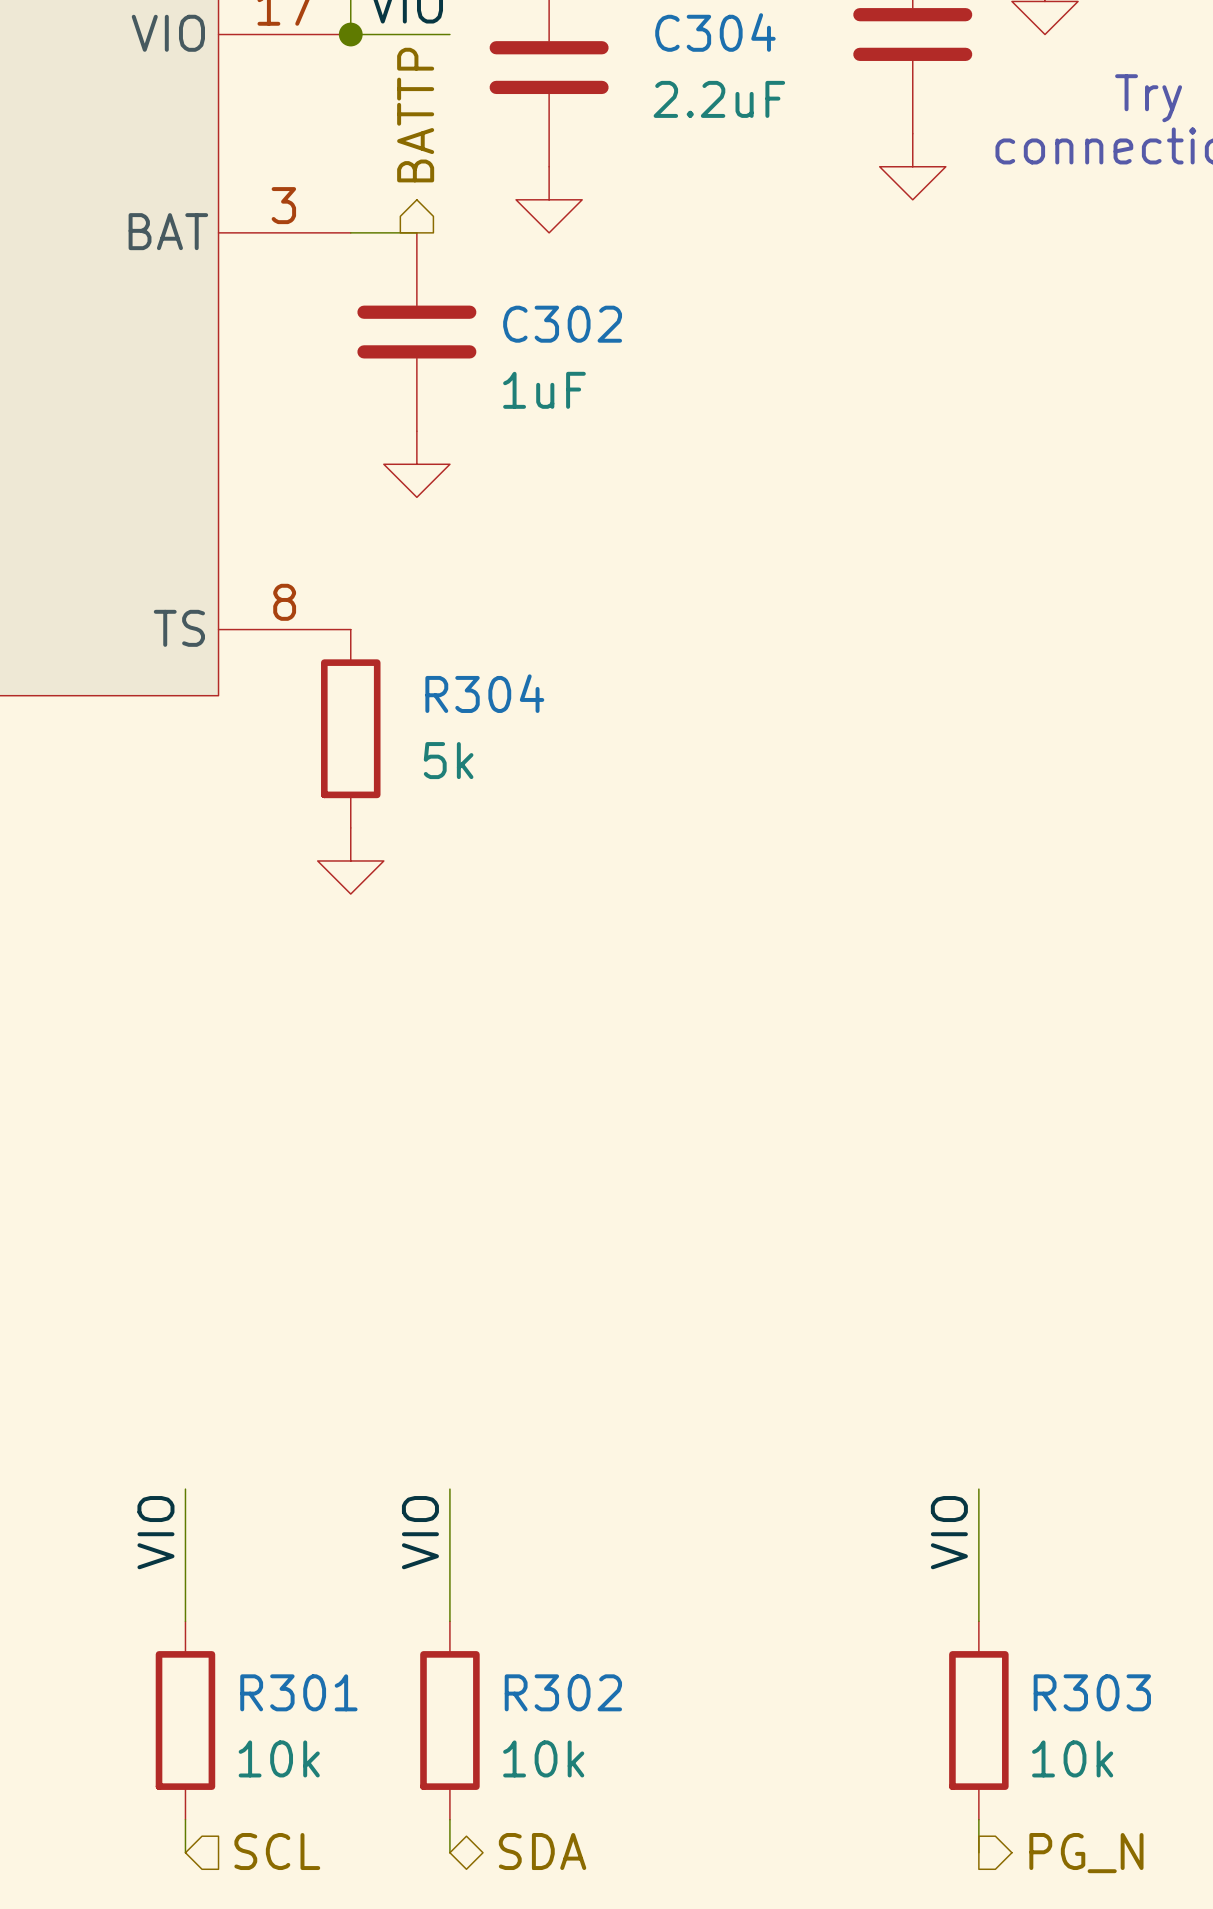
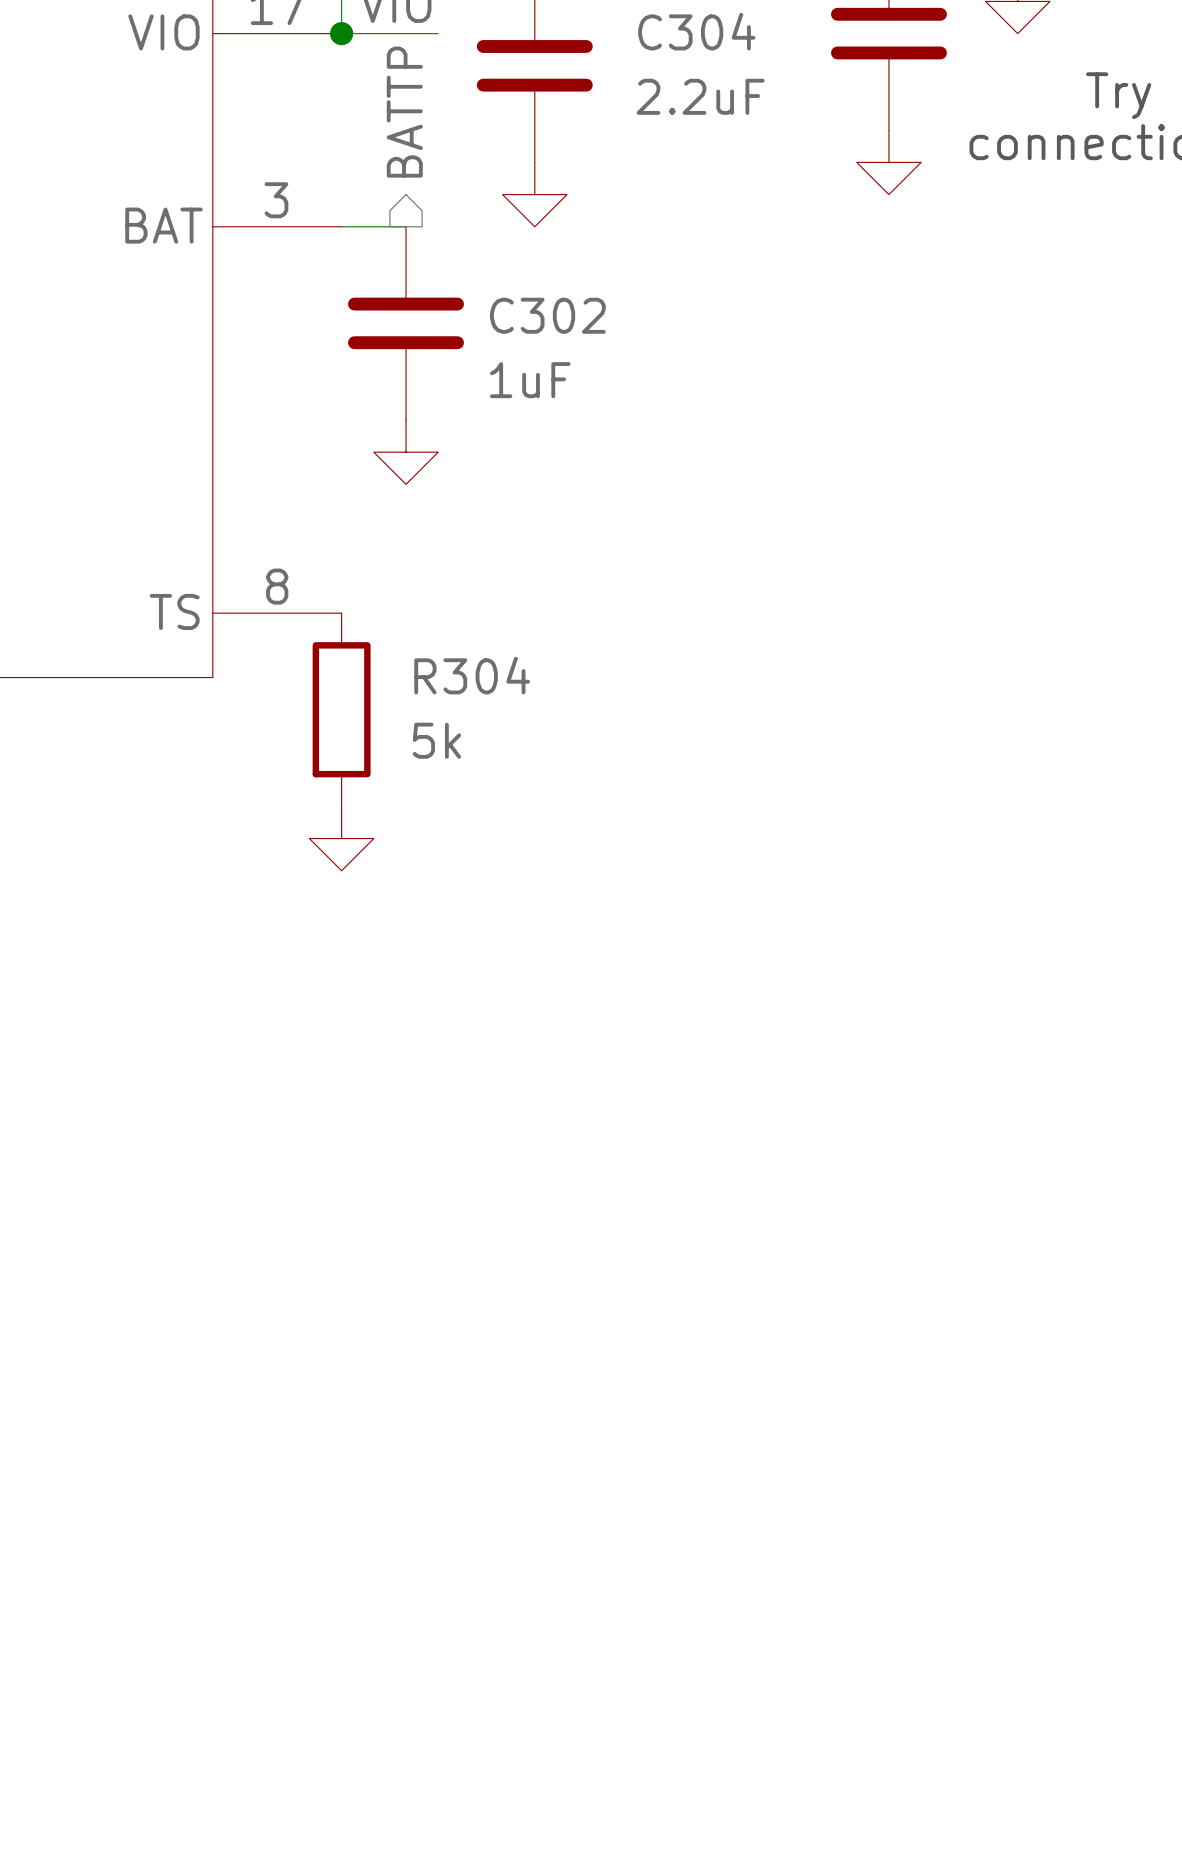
wire: (185, 1489) (185, 1621) -> none
wire: (449, 1489) (449, 1621) -> none
wire: (978, 1489) (978, 1621) -> none
label: VIO (155, 1532) -> none
label: VIO (420, 1532) -> none
label: VIO (949, 1532) -> none
R301: 10k (185, 1720) -> none
R302: 10k (449, 1720) -> none
R303: 10k (978, 1720) -> none
wire: (185, 1819) (185, 1852) -> none
wire: (449, 1819) (449, 1852) -> none
wire: (978, 1819) (978, 1852) -> none
hierarchical label: SCL (277, 1851) -> none
hierarchical label: SDA (542, 1851) -> none
hierarchical label: PG_N (1086, 1853) -> none

